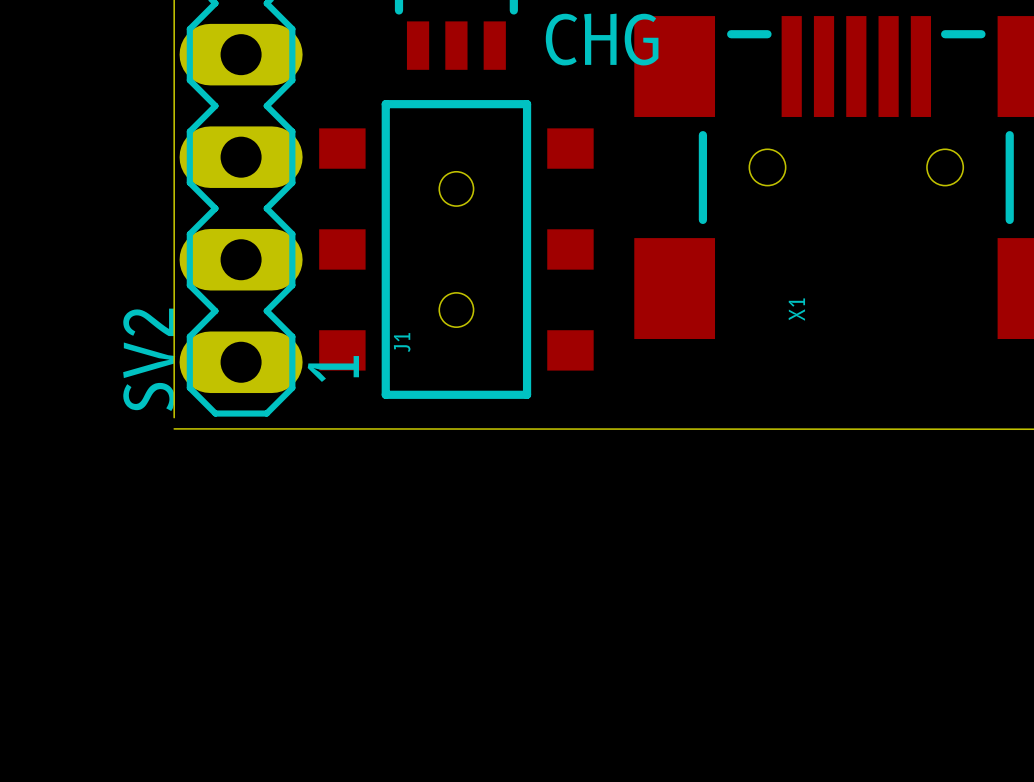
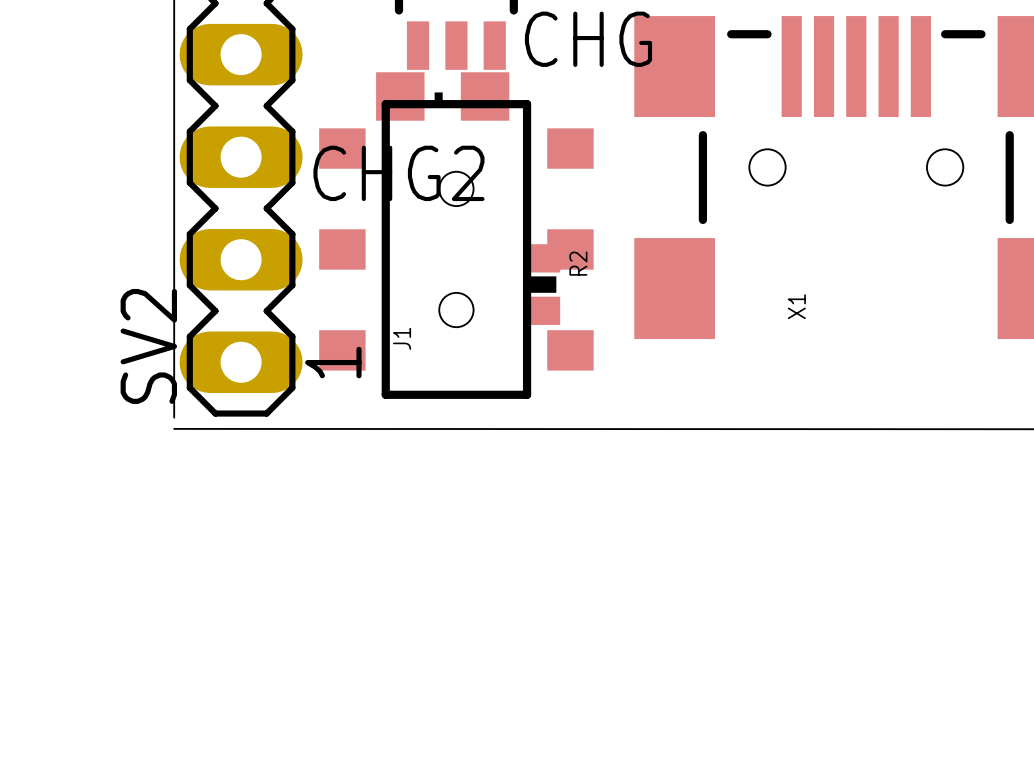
CHG2: none -> (442, 96)
R2: none -> (542, 284)

